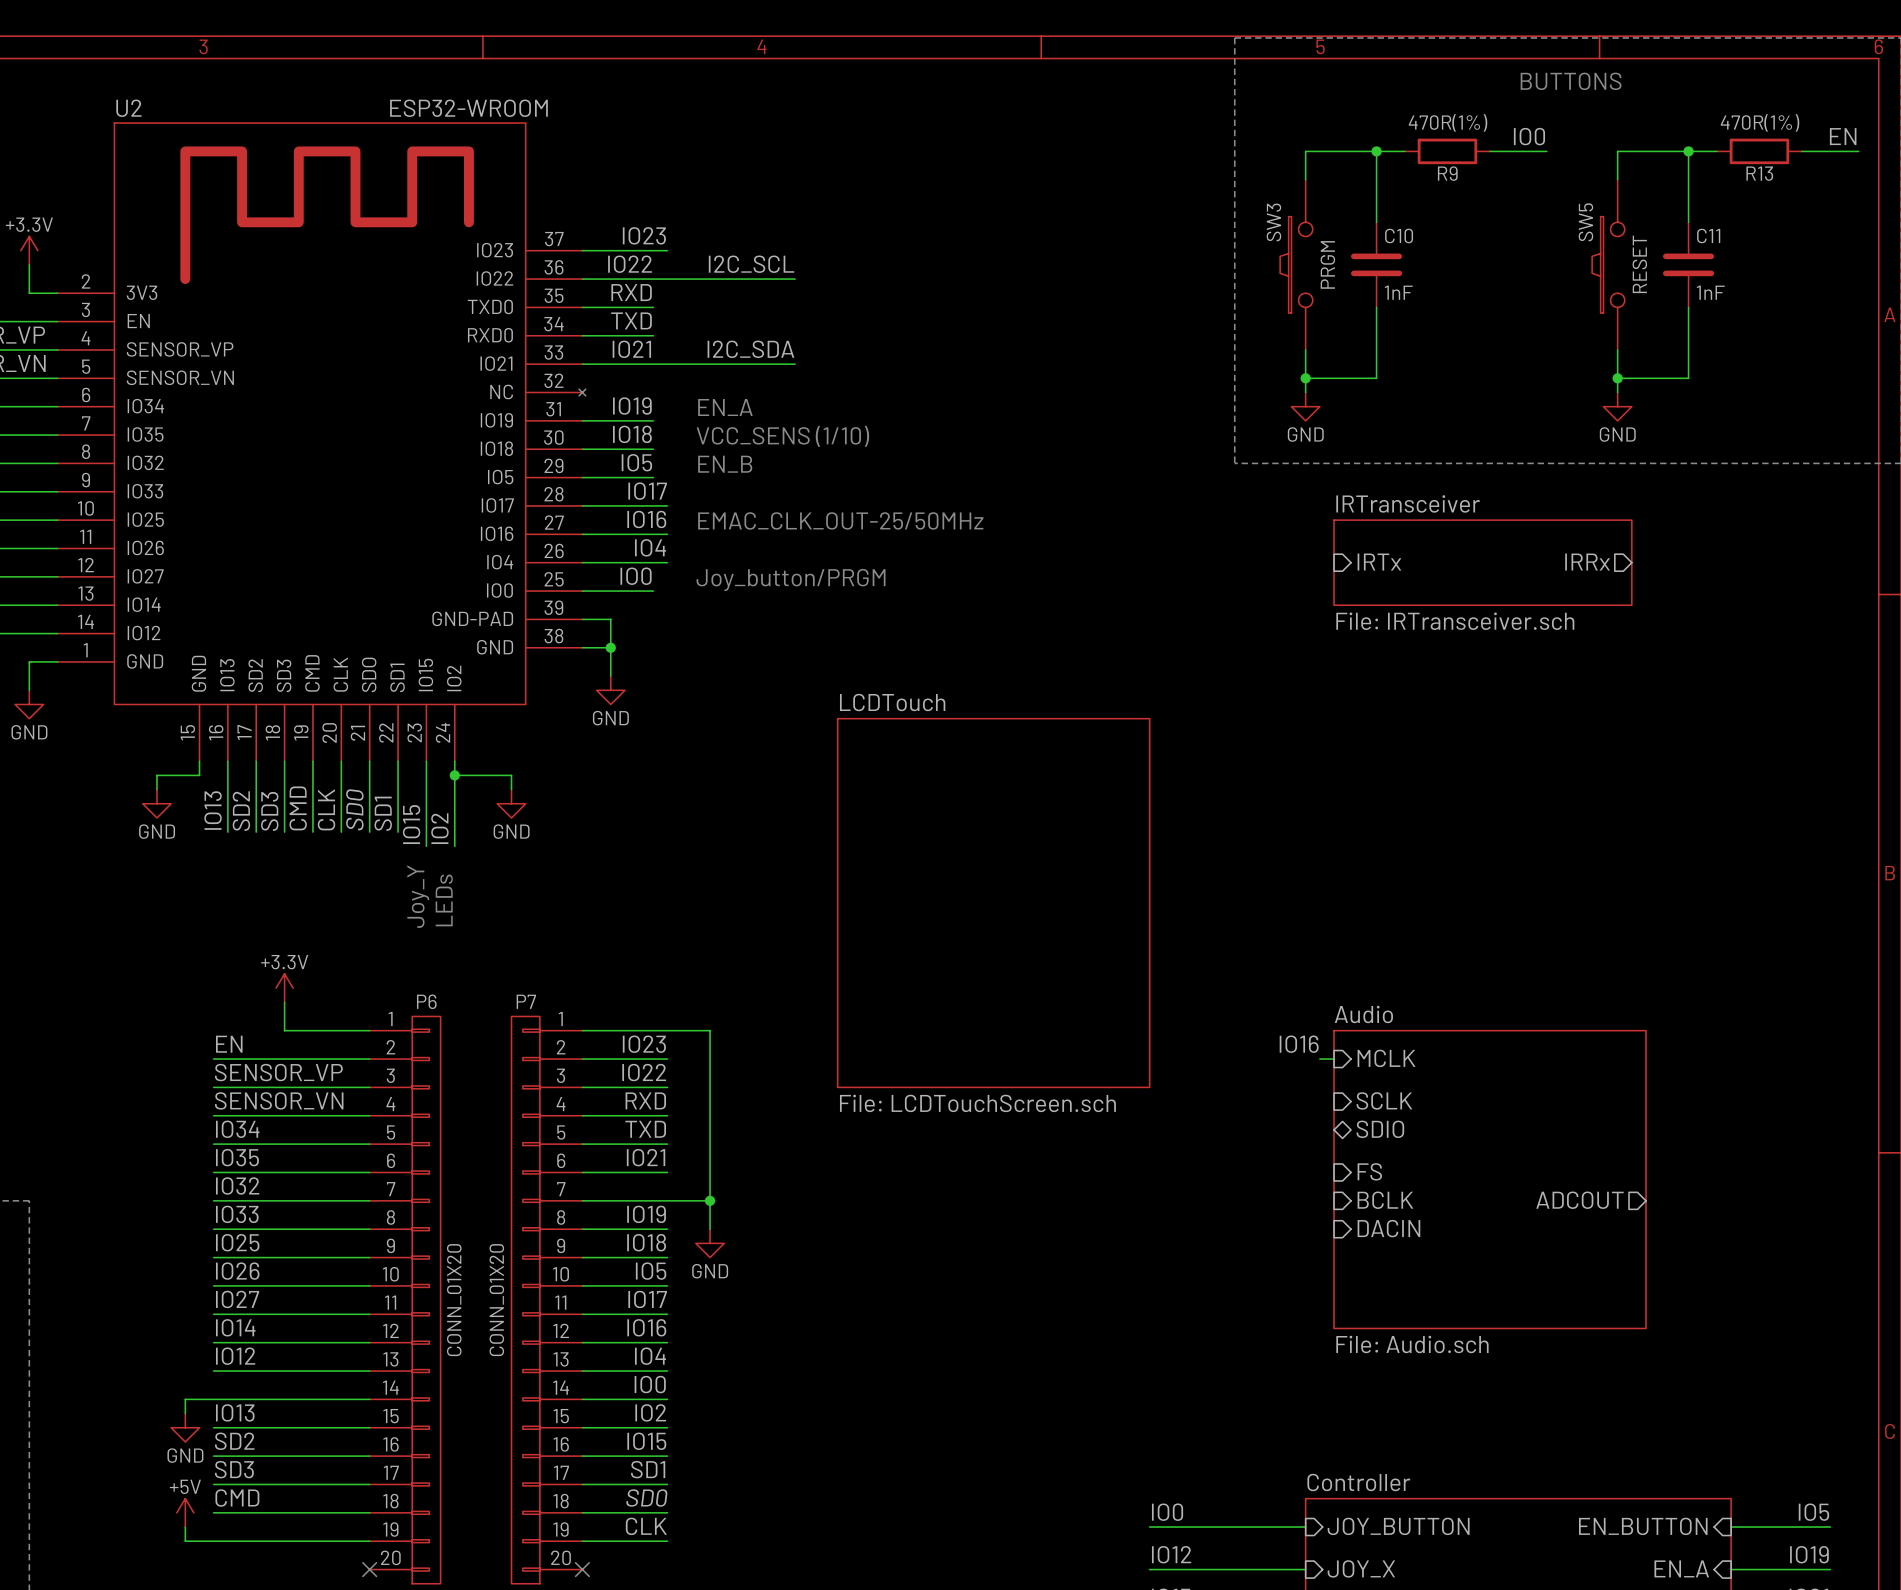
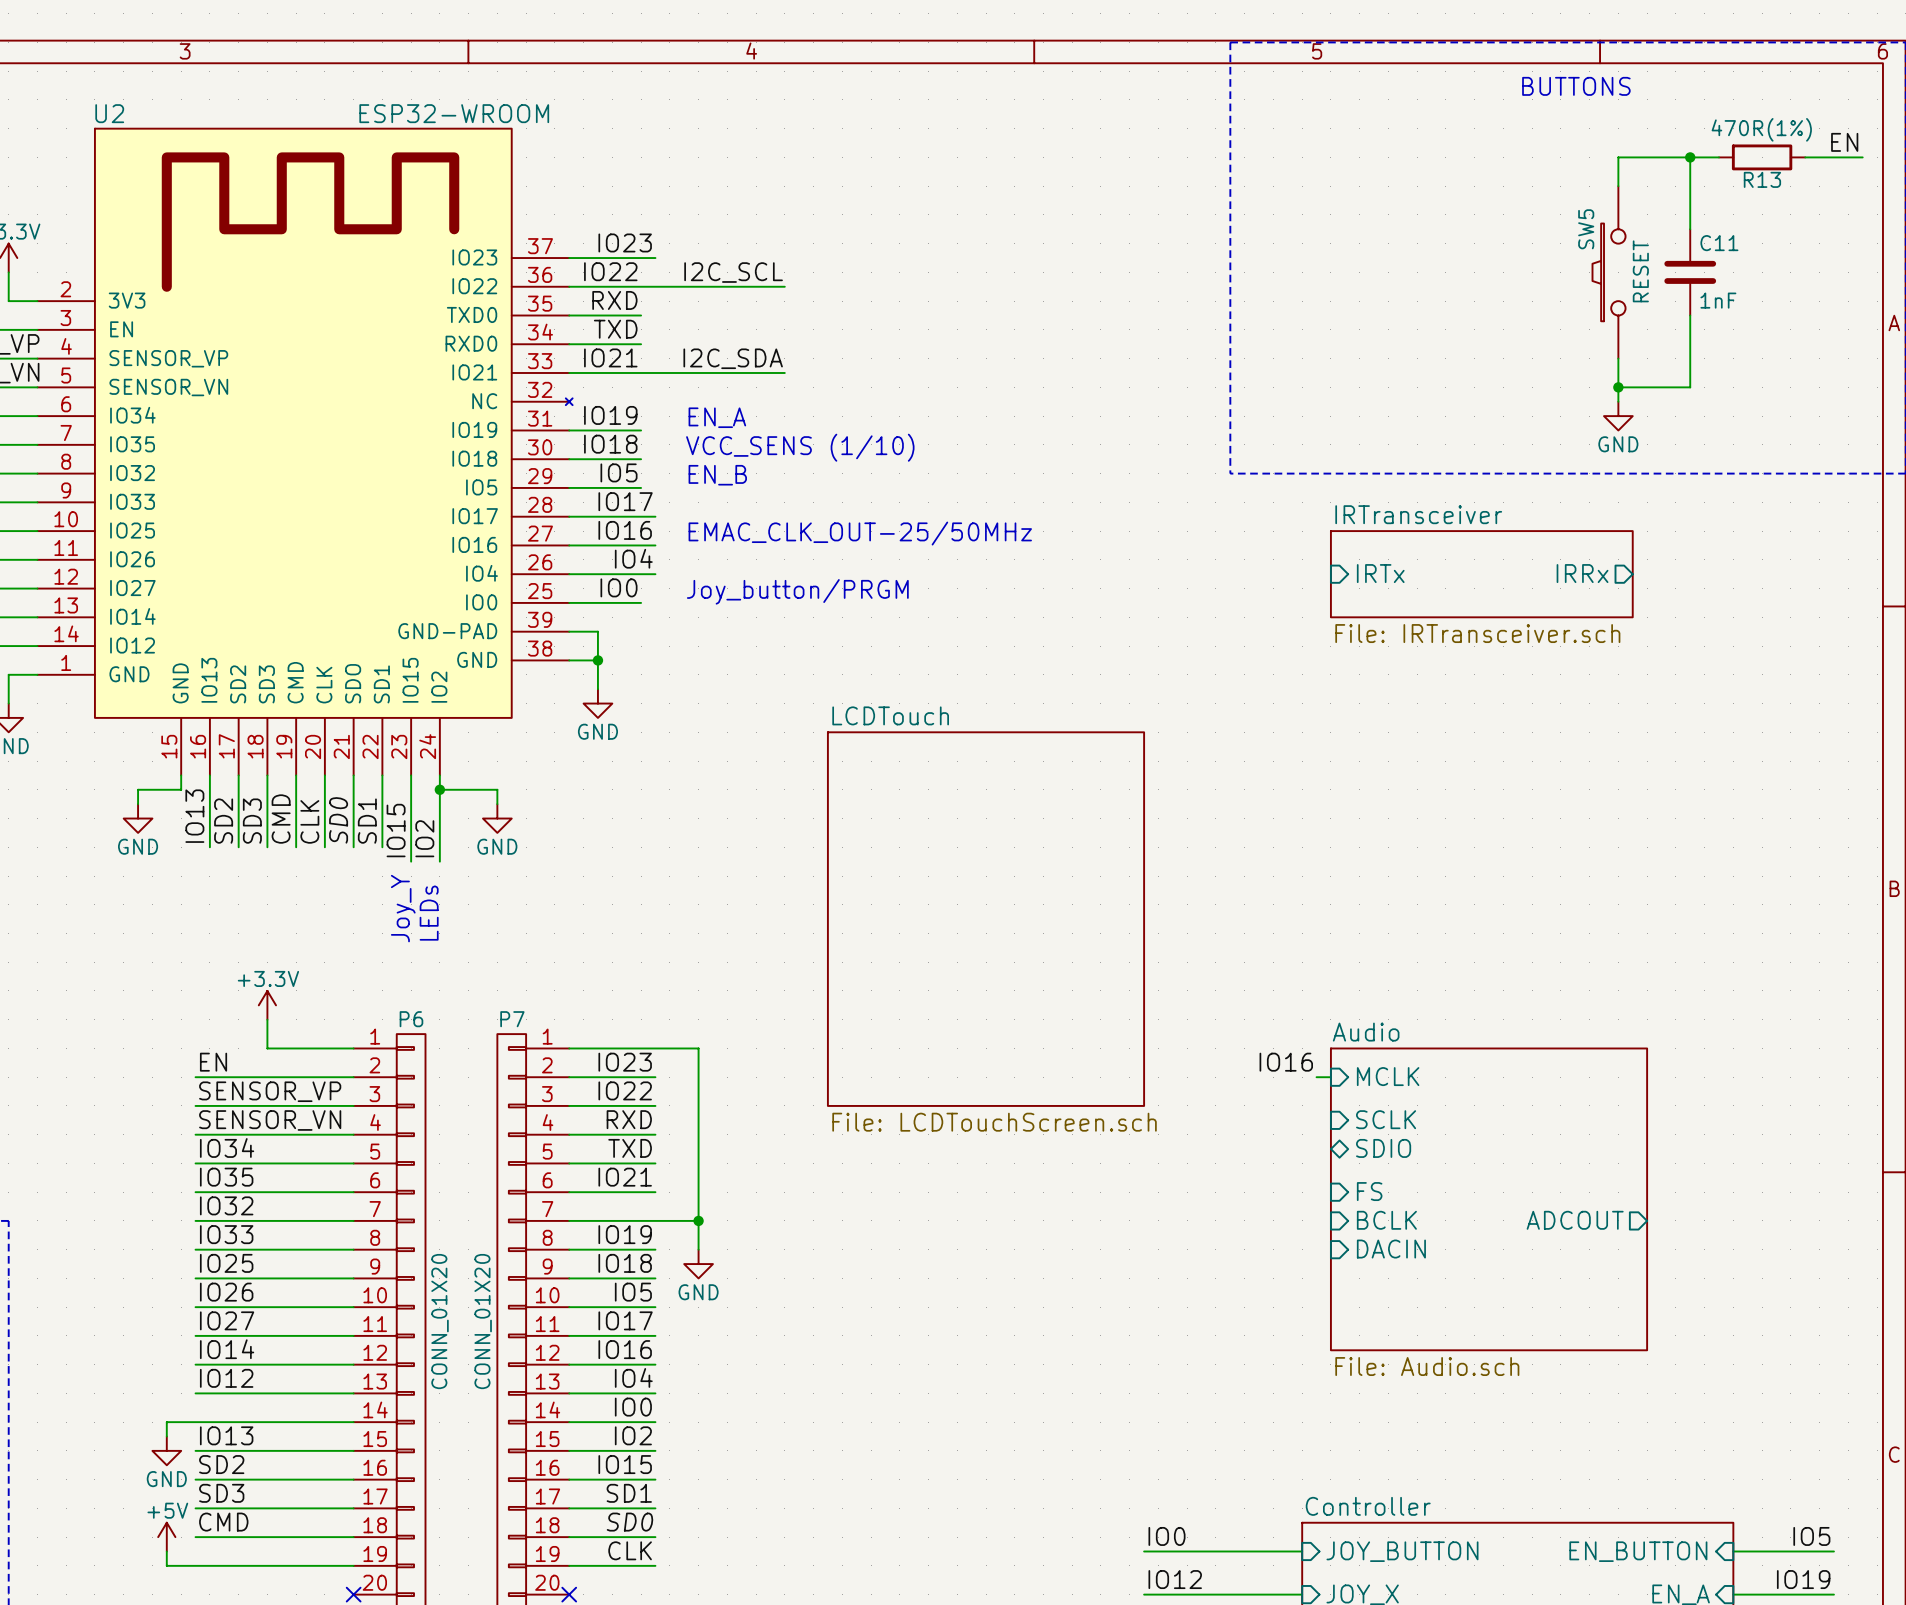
label: IO0 (1529, 136) -> none
wire: (1376, 151) (1376, 222) -> none
junction: (1376, 151) -> none
wire: (1404, 151) (1305, 151) (1305, 179) -> none
R9: 470R(1%) (1447, 151) -> none
wire: (1490, 151) (1546, 151) -> none
SW3: PRGM (1296, 264) -> none
C10: 1nF (1376, 264) -> none
wire: (1376, 307) (1376, 378) (1305, 378) -> none
wire: (1305, 349) (1305, 392) -> none
junction: (1305, 378) -> none
power symbol: GND (1305, 406) -> none

